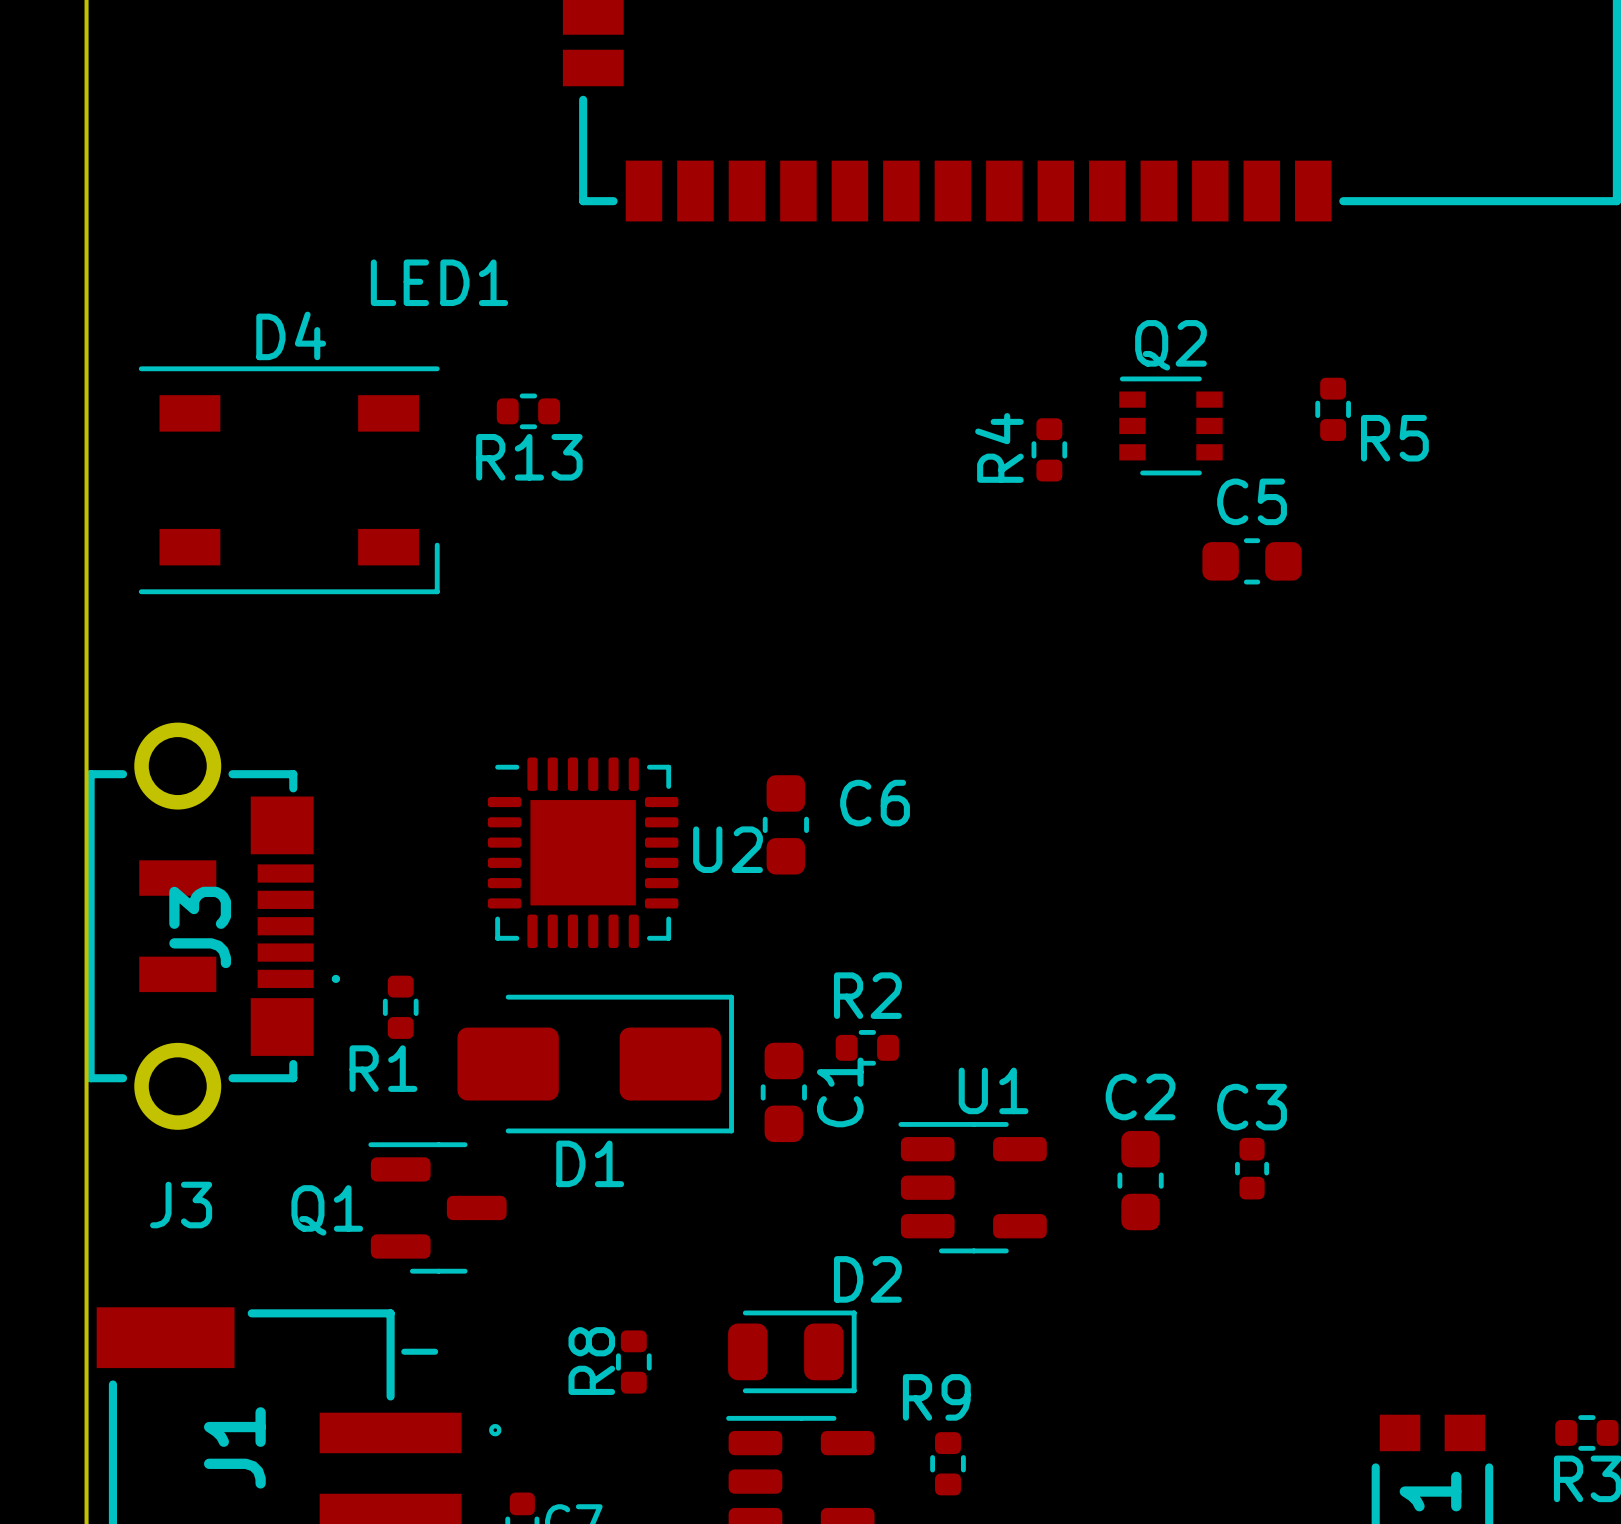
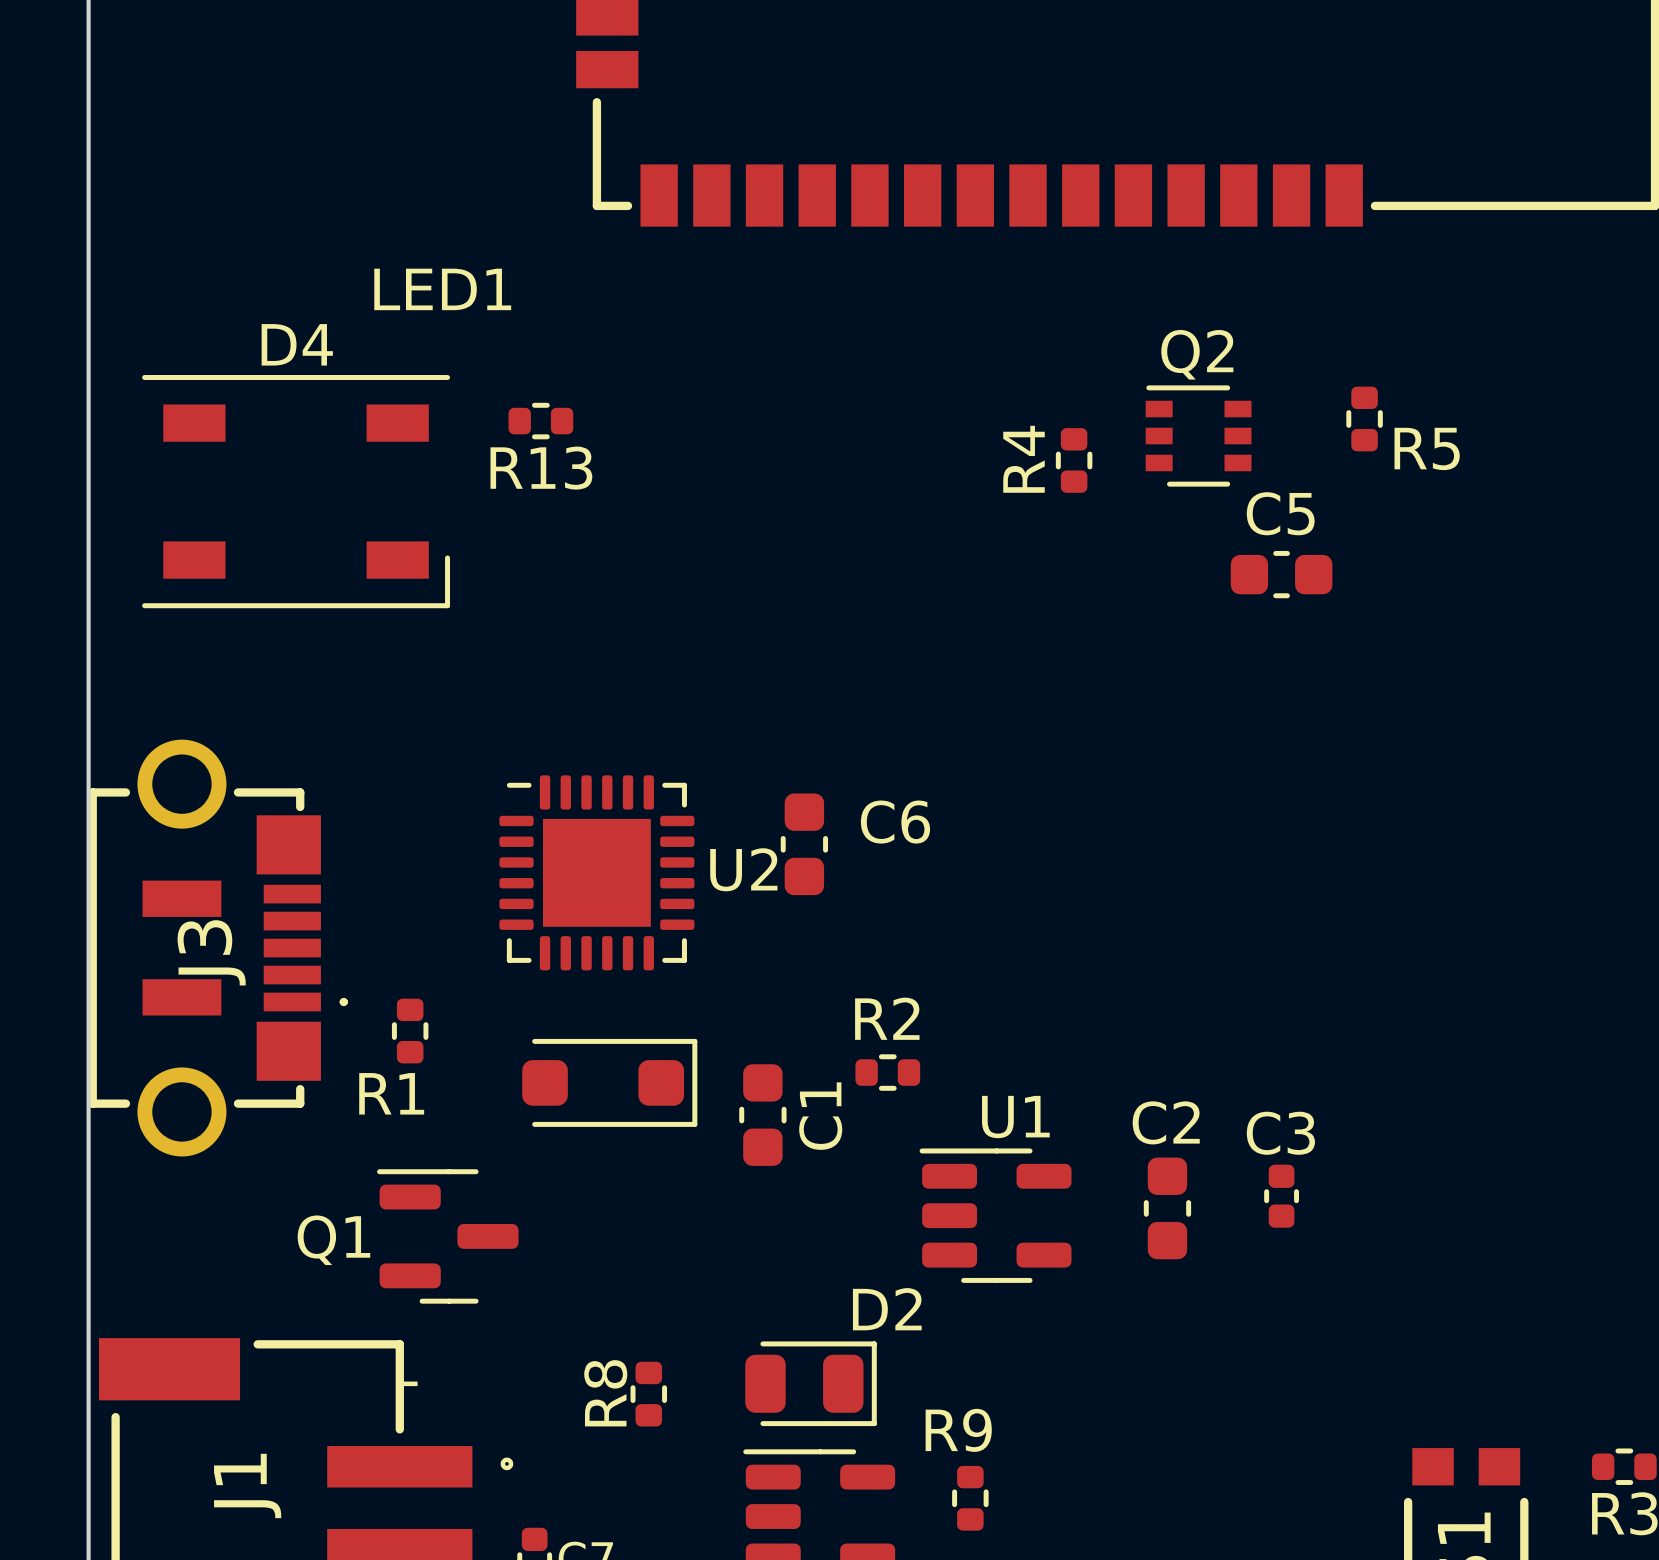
part: none -> (609, 1082)
D1: (595, 1064) -> none
C1 position: (783, 1092) -> (762, 1115)
text: J3 (181, 1205) -> none

